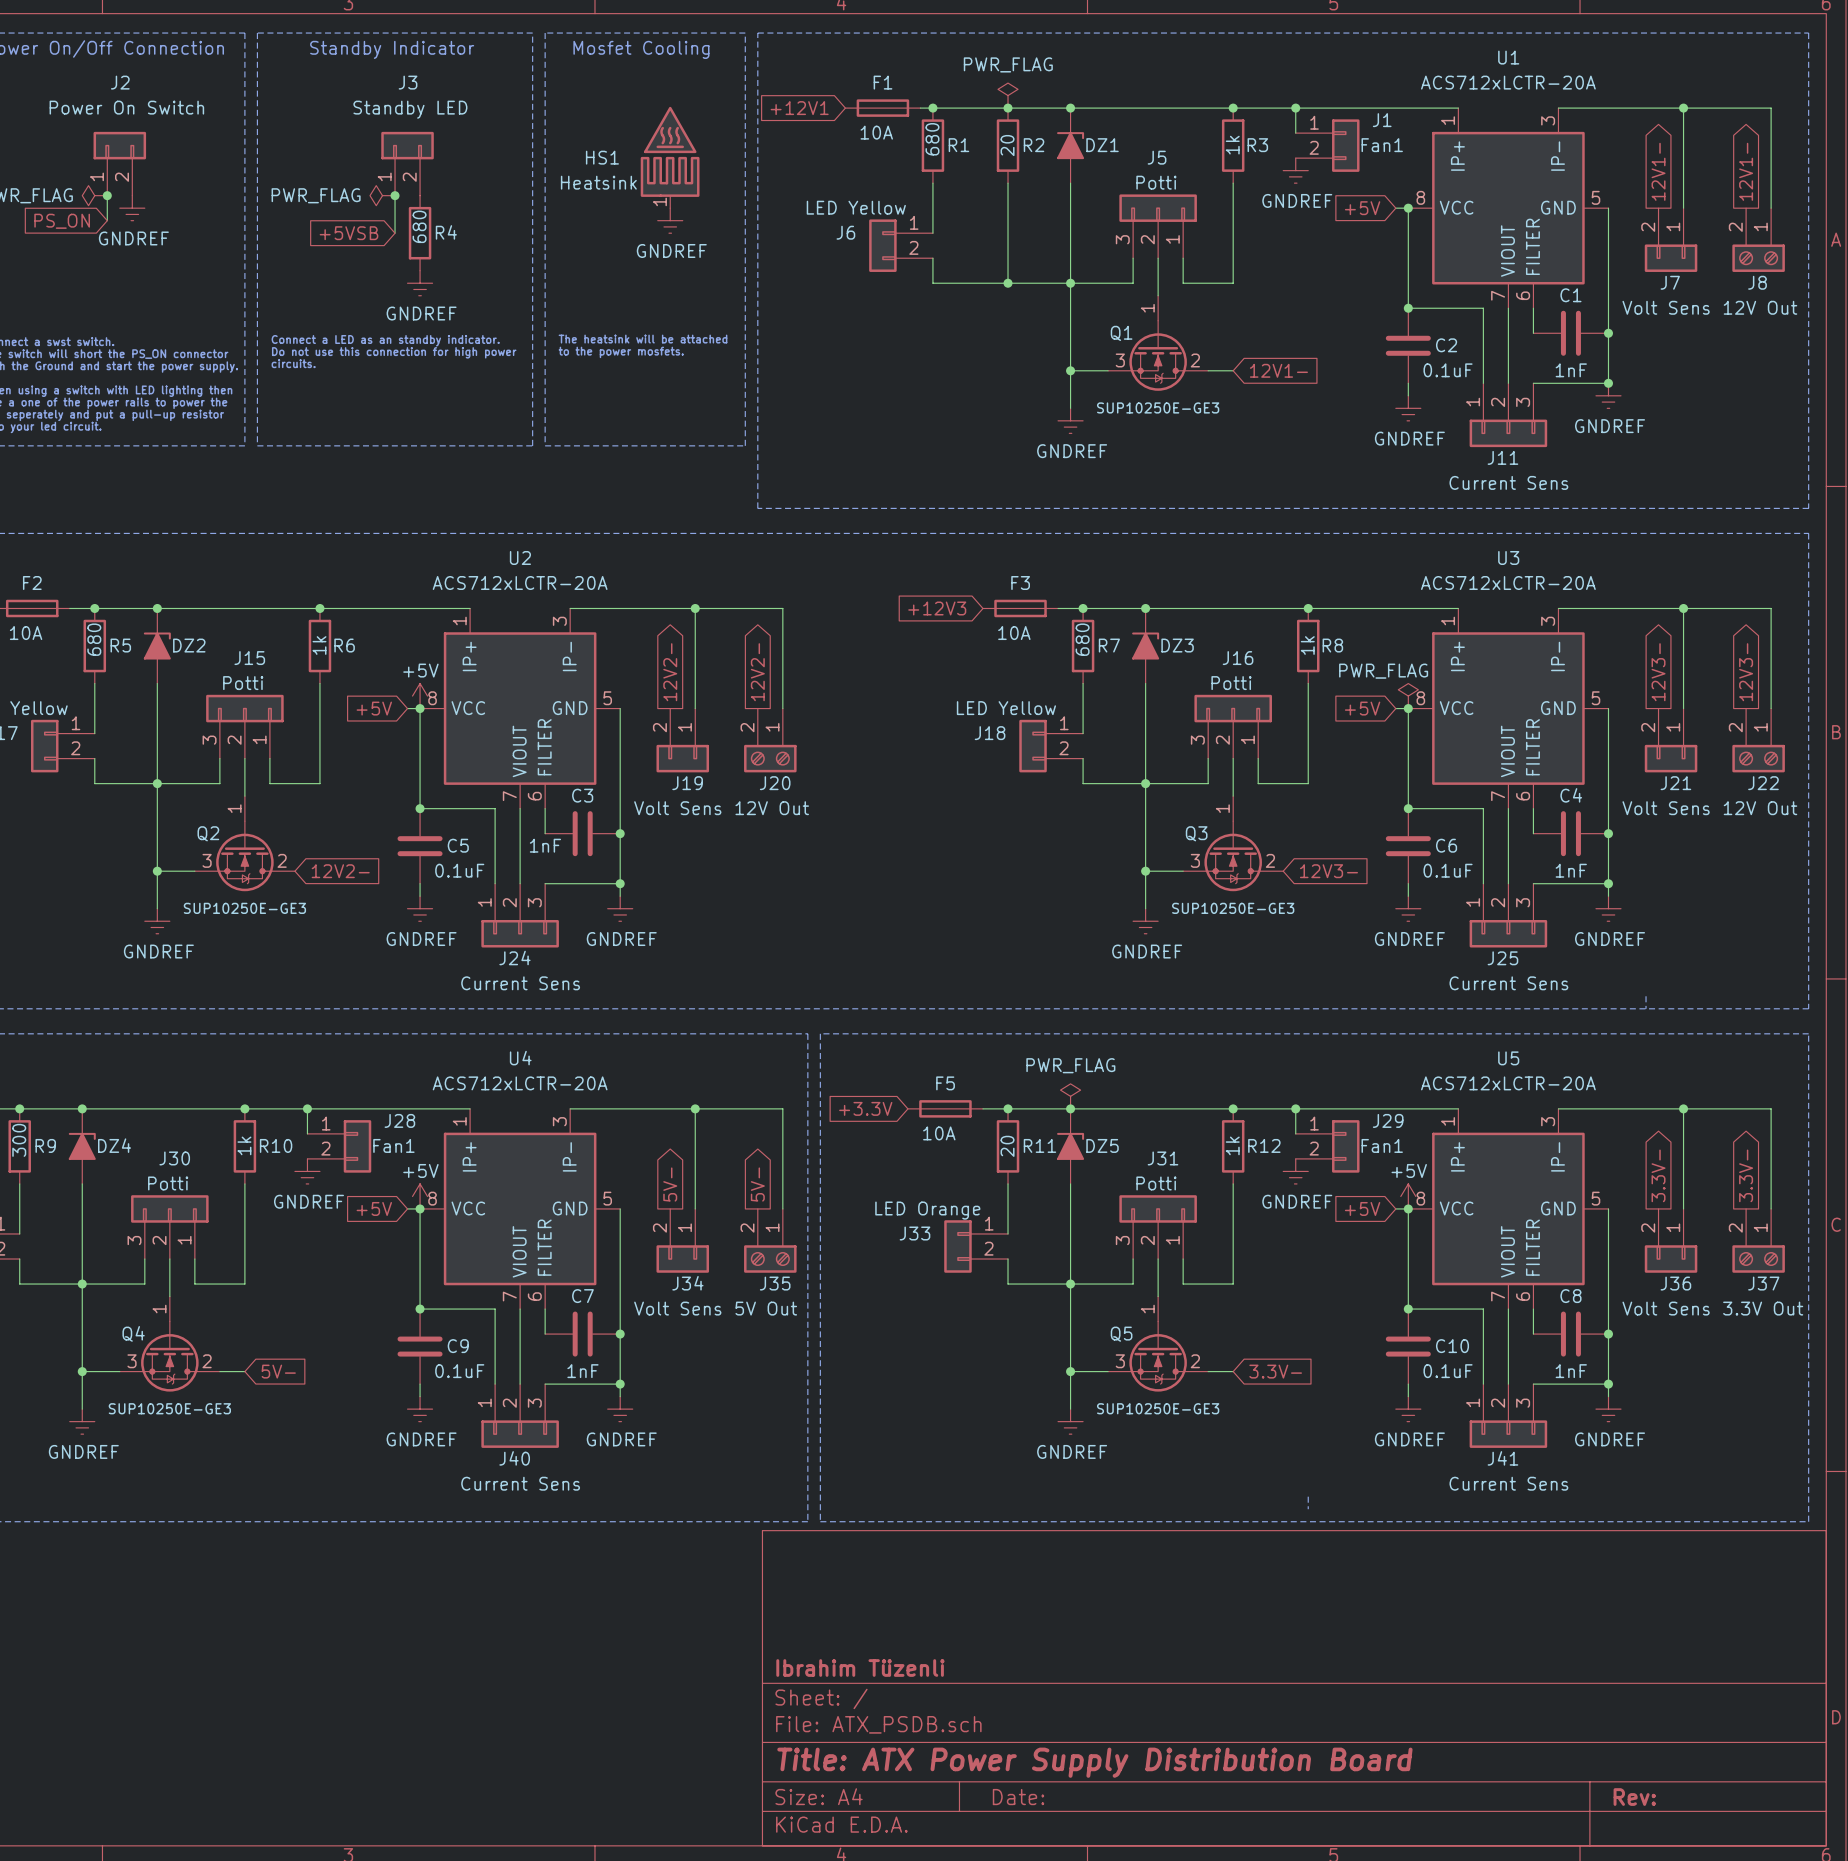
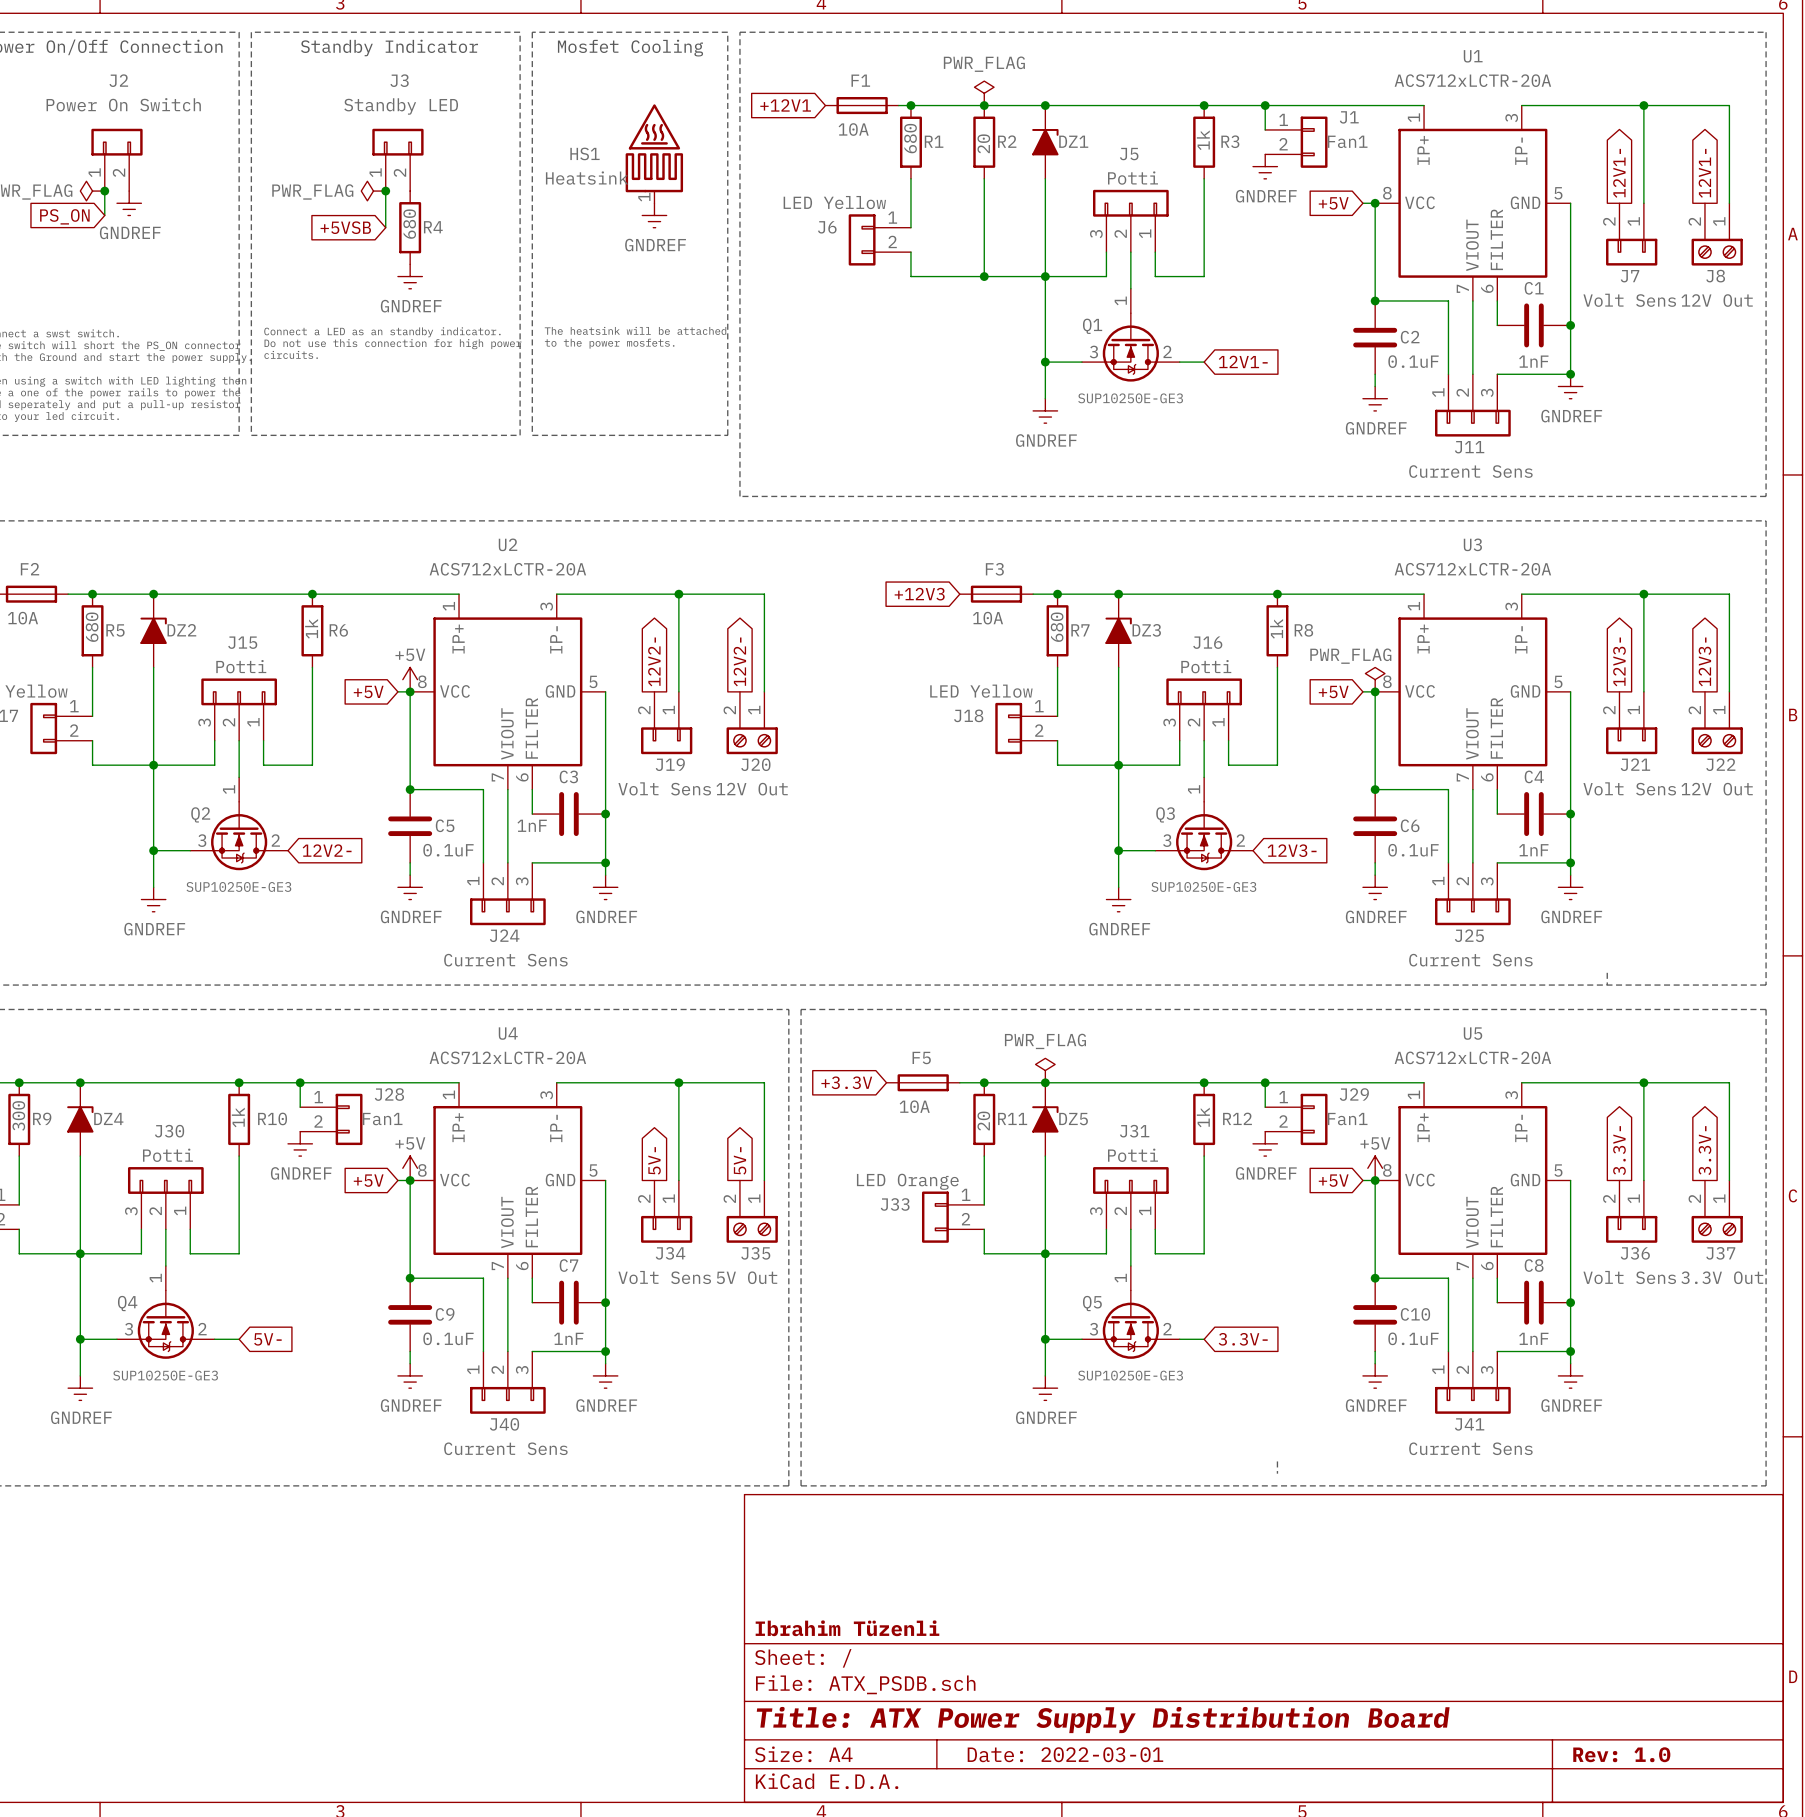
title block: Date: (1018, 1797) -> Date: 2022-03-01 (1065, 1754)
title block: Rev: (1634, 1797) -> Rev: 1.0 (1621, 1754)

